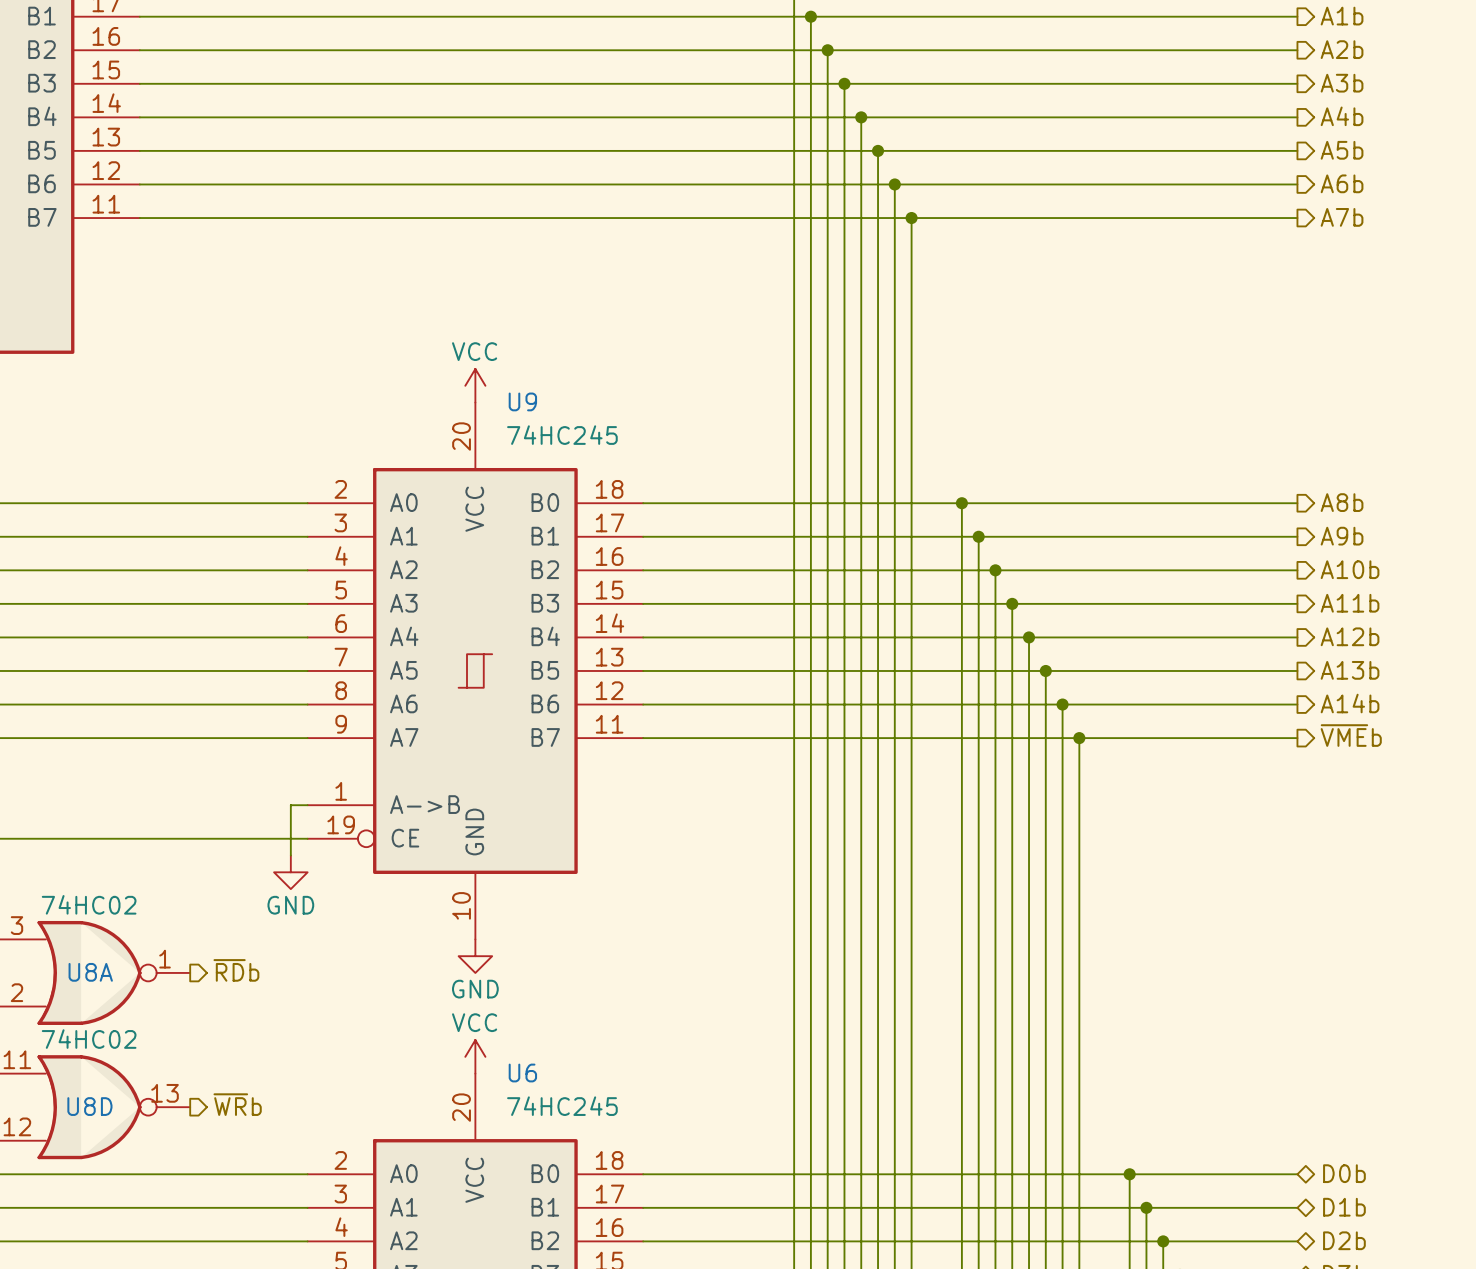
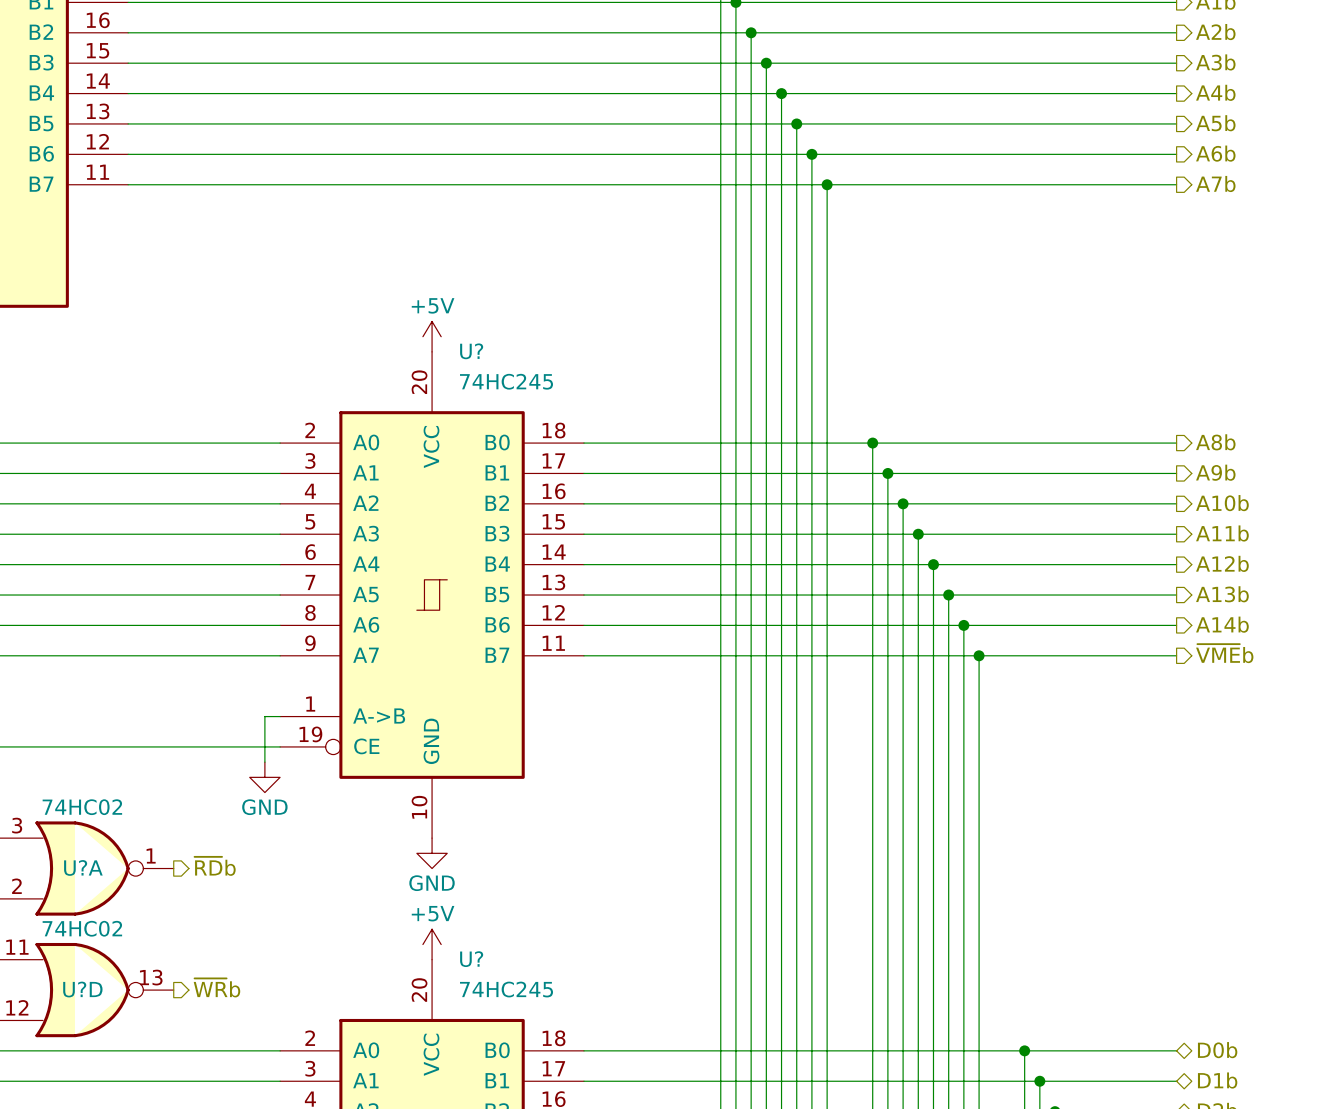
power symbol: VCC (475, 385) -> +5V (432, 336)
U9 name: U9 (522, 401) -> U? (471, 351)
U8A name: U8A (90, 972) -> U?A (83, 867)
power symbol: VCC (475, 1056) -> +5V (432, 944)
U6 name: U6 (522, 1073) -> U? (471, 959)
U8D name: U8D (89, 1106) -> U?D (82, 989)

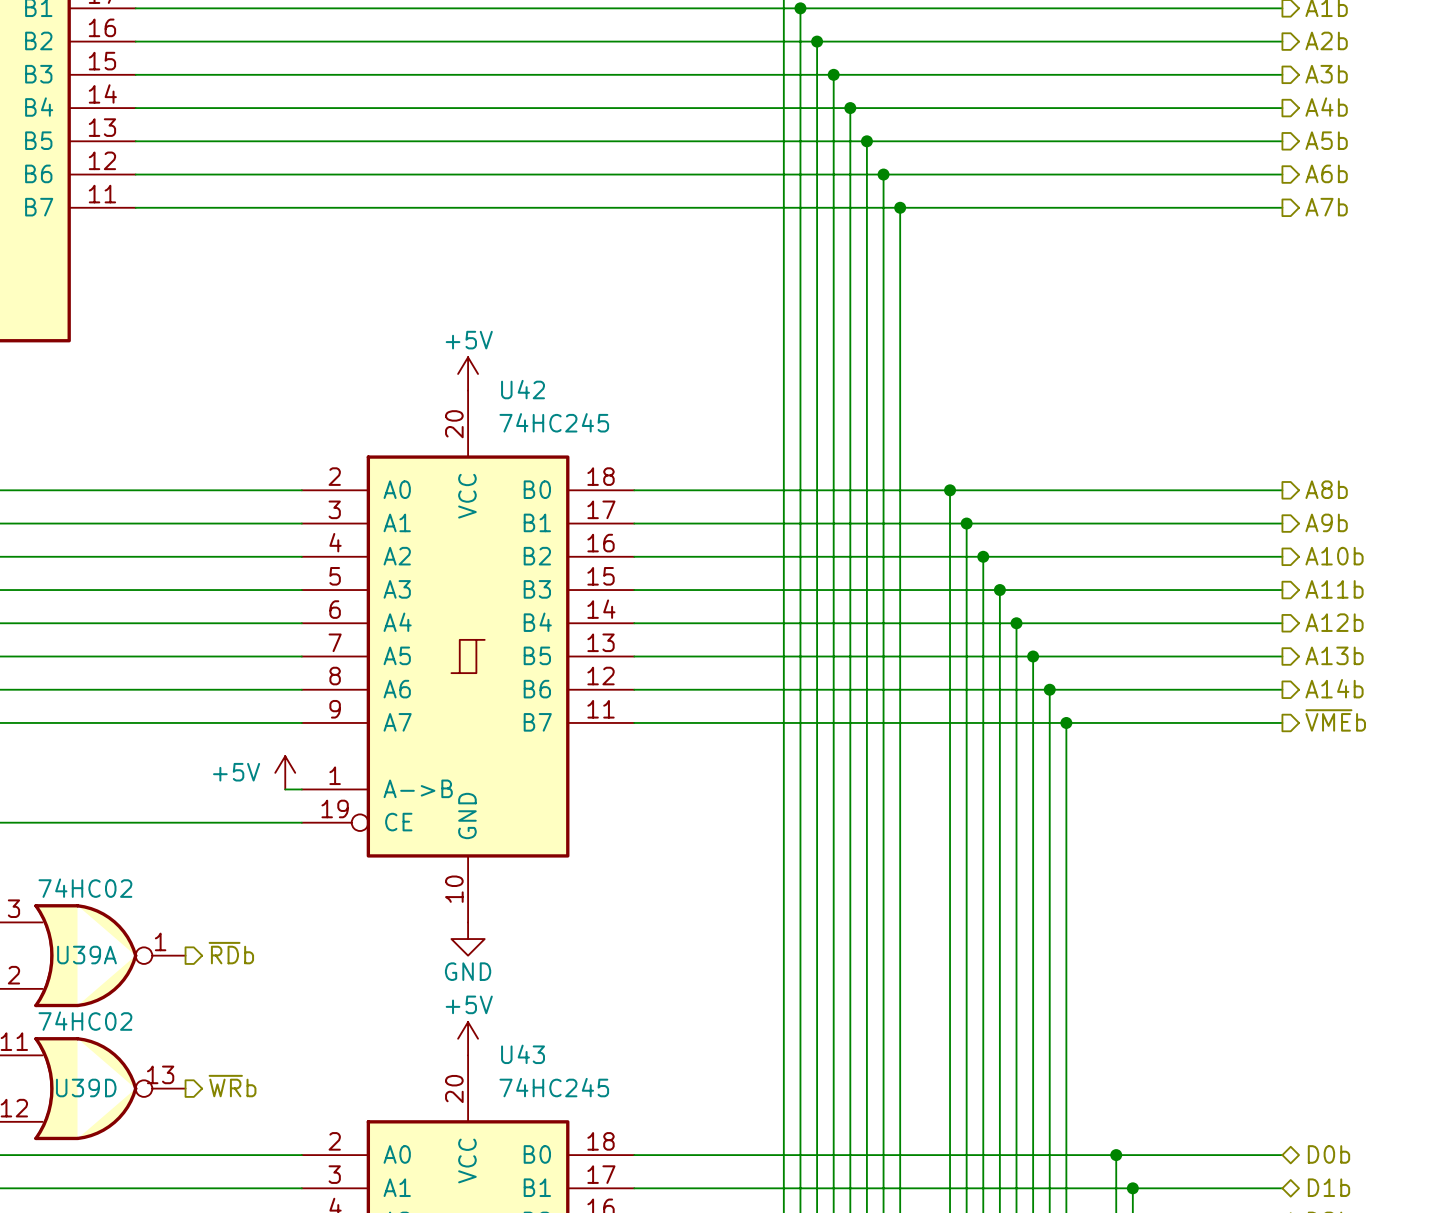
U? name: U? (471, 351) -> U42 (523, 389)
power symbol: none -> +5V (285, 772)
wire: (264, 716) (264, 762) -> none
power symbol: GND (264, 777) -> none
U?A name: U?A (83, 867) -> U39A (87, 955)
U? name: U? (471, 959) -> U43 (523, 1054)
U?D name: U?D (82, 989) -> U39D (86, 1087)

